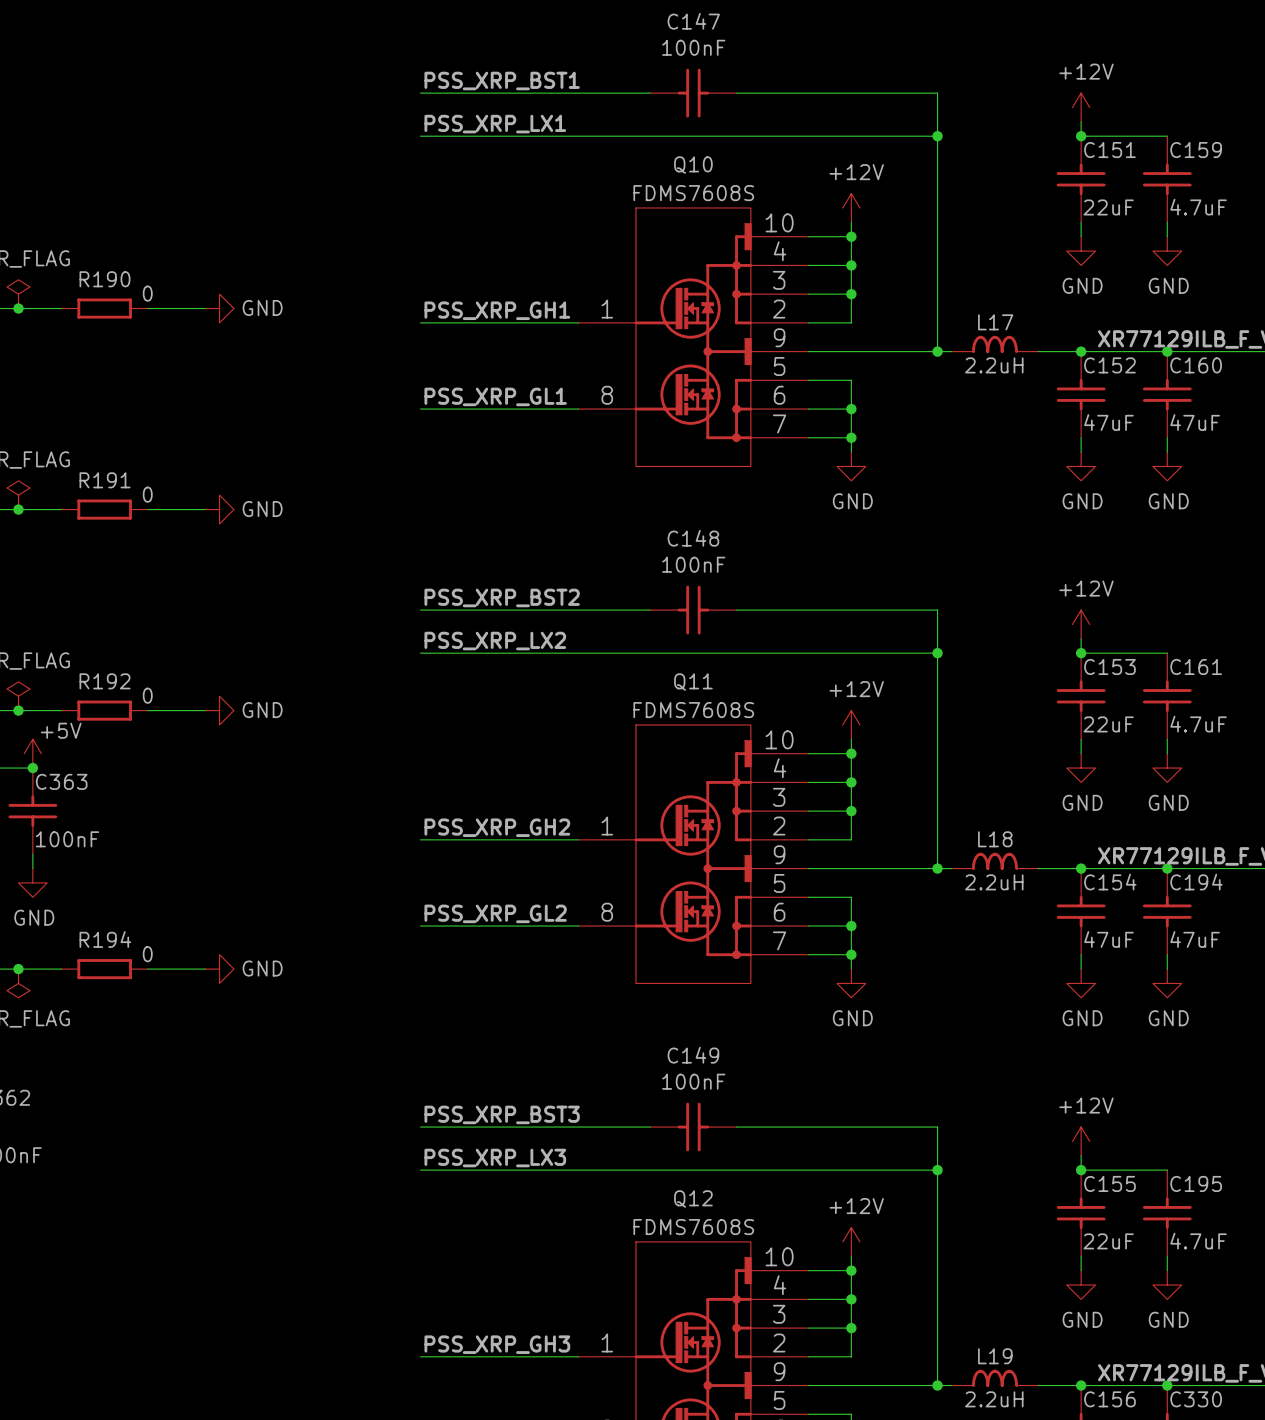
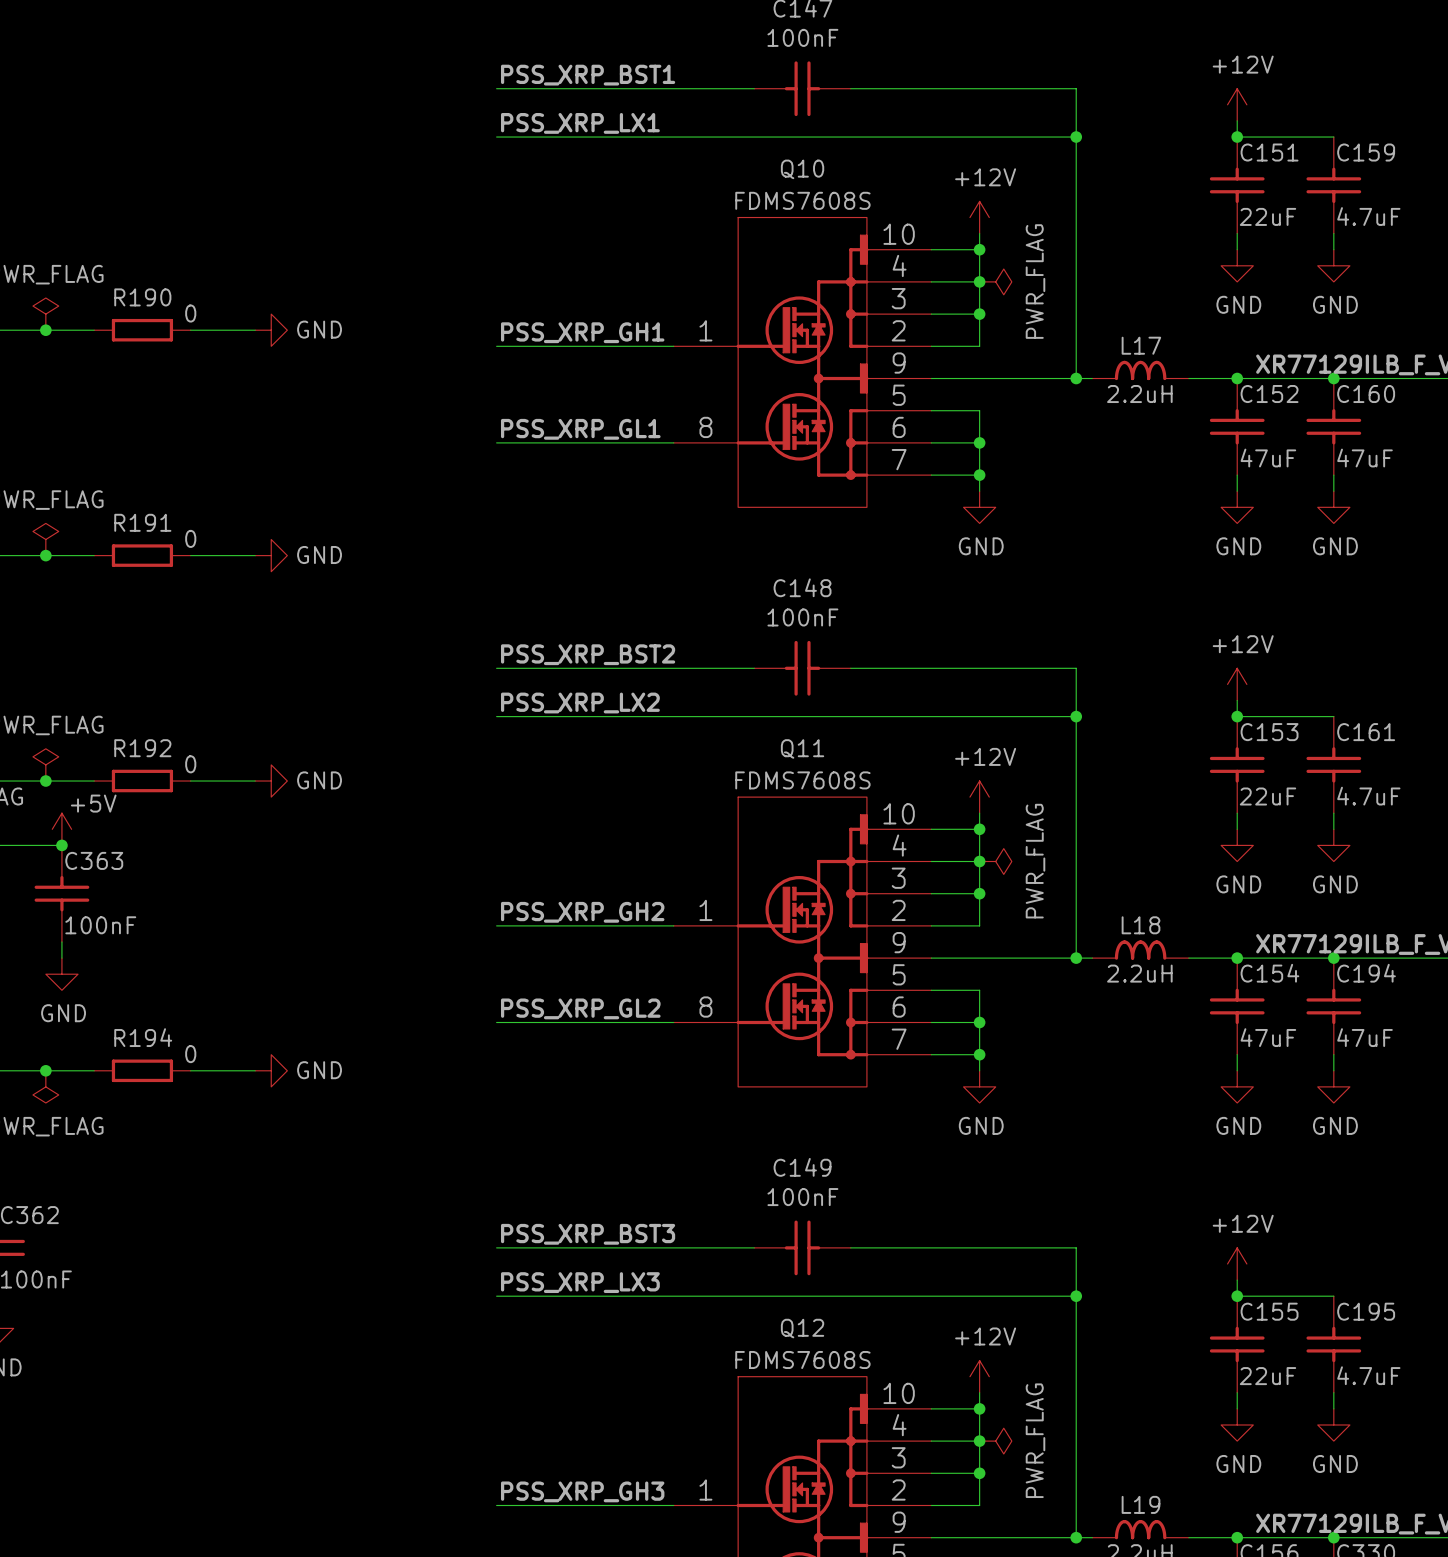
power symbol: none -> PWR_FLAG (995, 281)
power symbol: none -> PWR_FLAG (995, 861)
power symbol: none -> PWR_FLAG (995, 1441)

